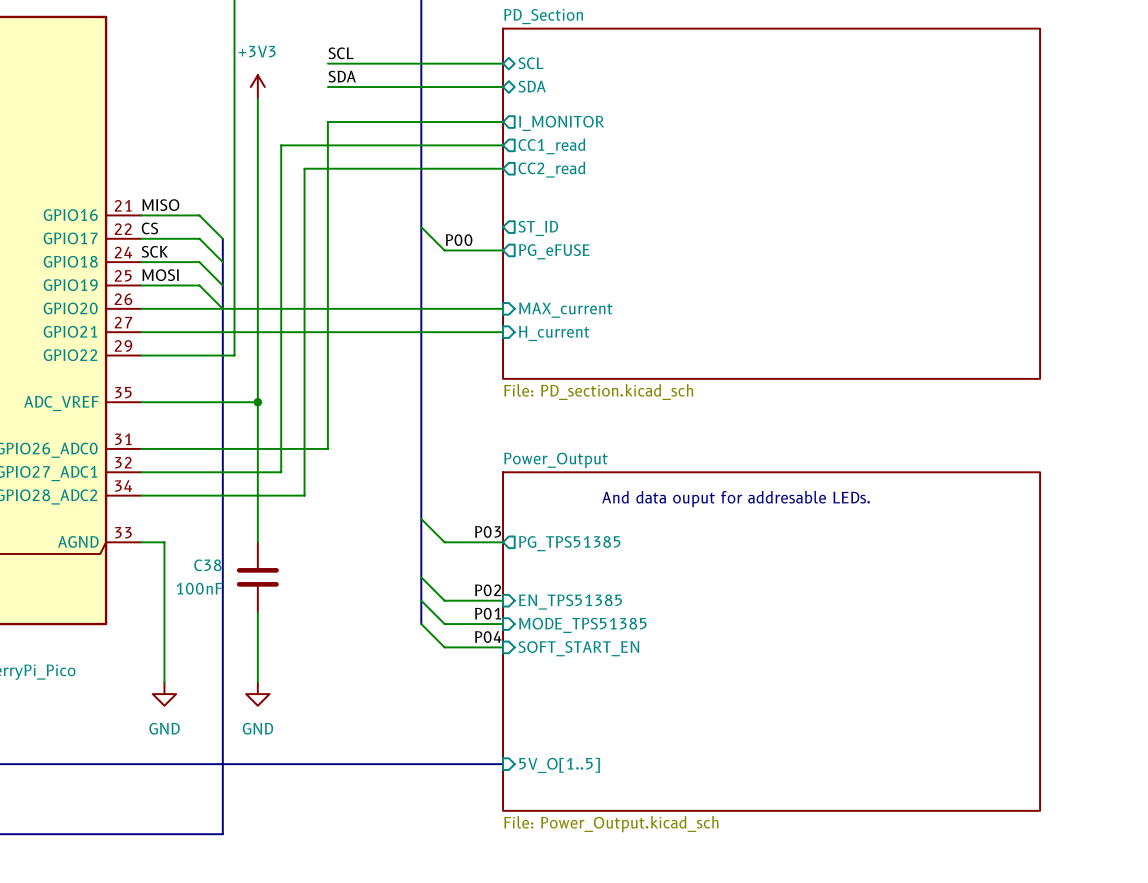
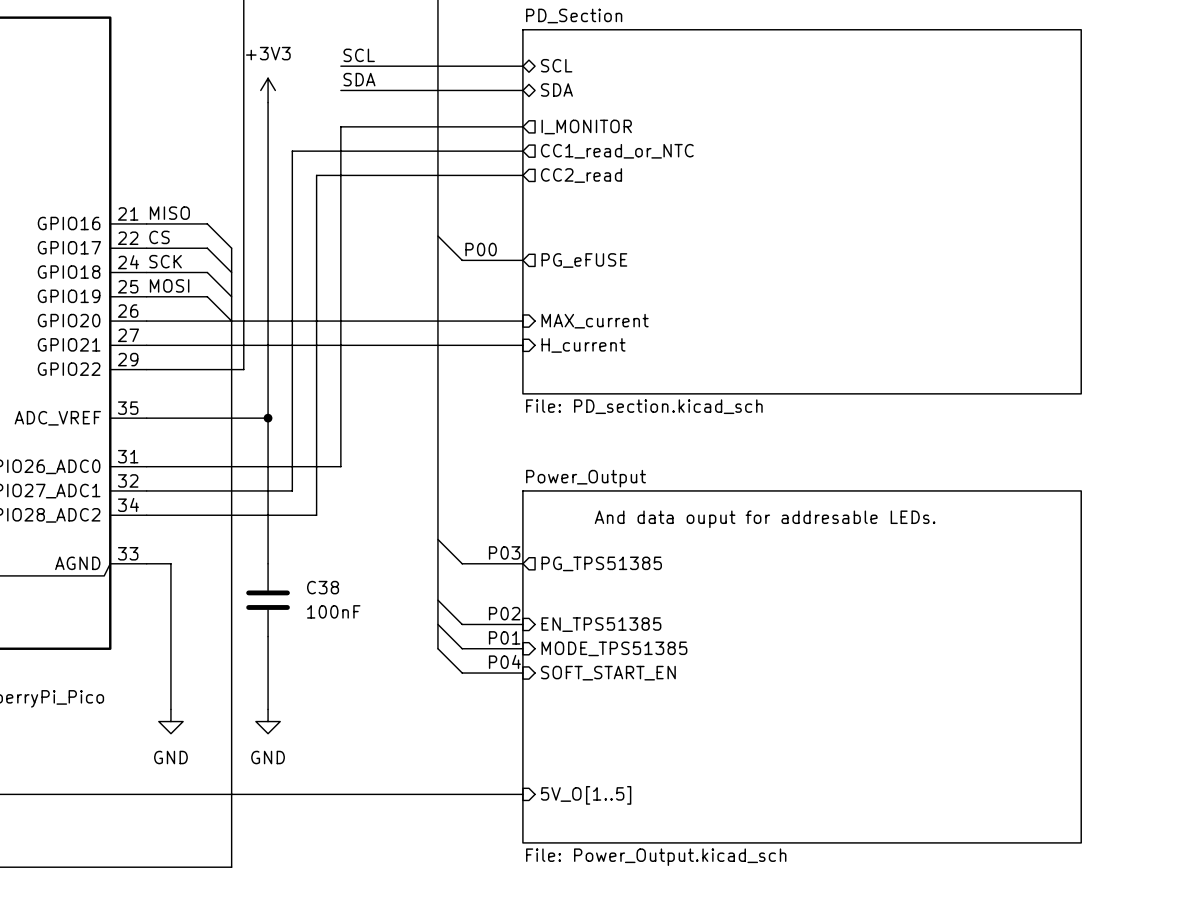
sheet pin: CC1_read (551, 146) -> CC1_read_or_NTC (617, 151)
sheet pin: ST_ID (538, 228) -> none
C38 name position: C38 (207, 565) -> C38 (323, 587)
C38 value position: 100nF (199, 588) -> 100nF (333, 611)

